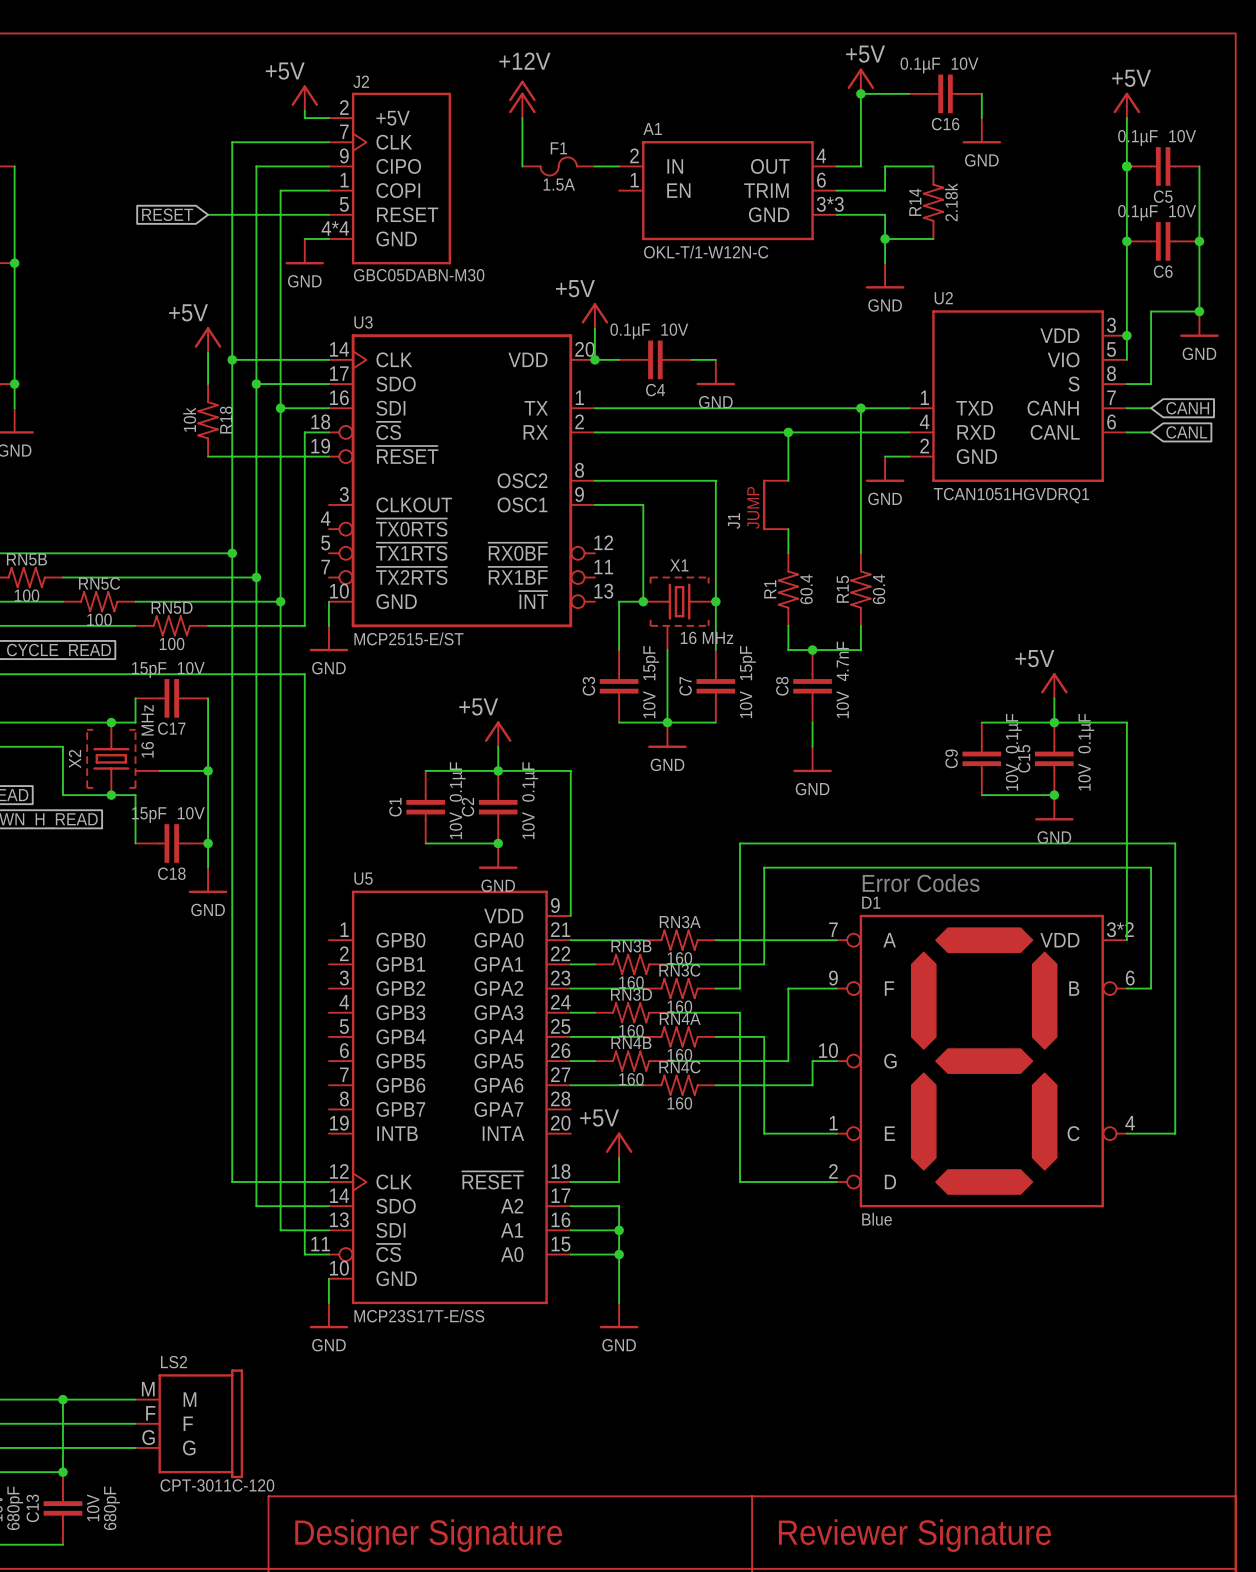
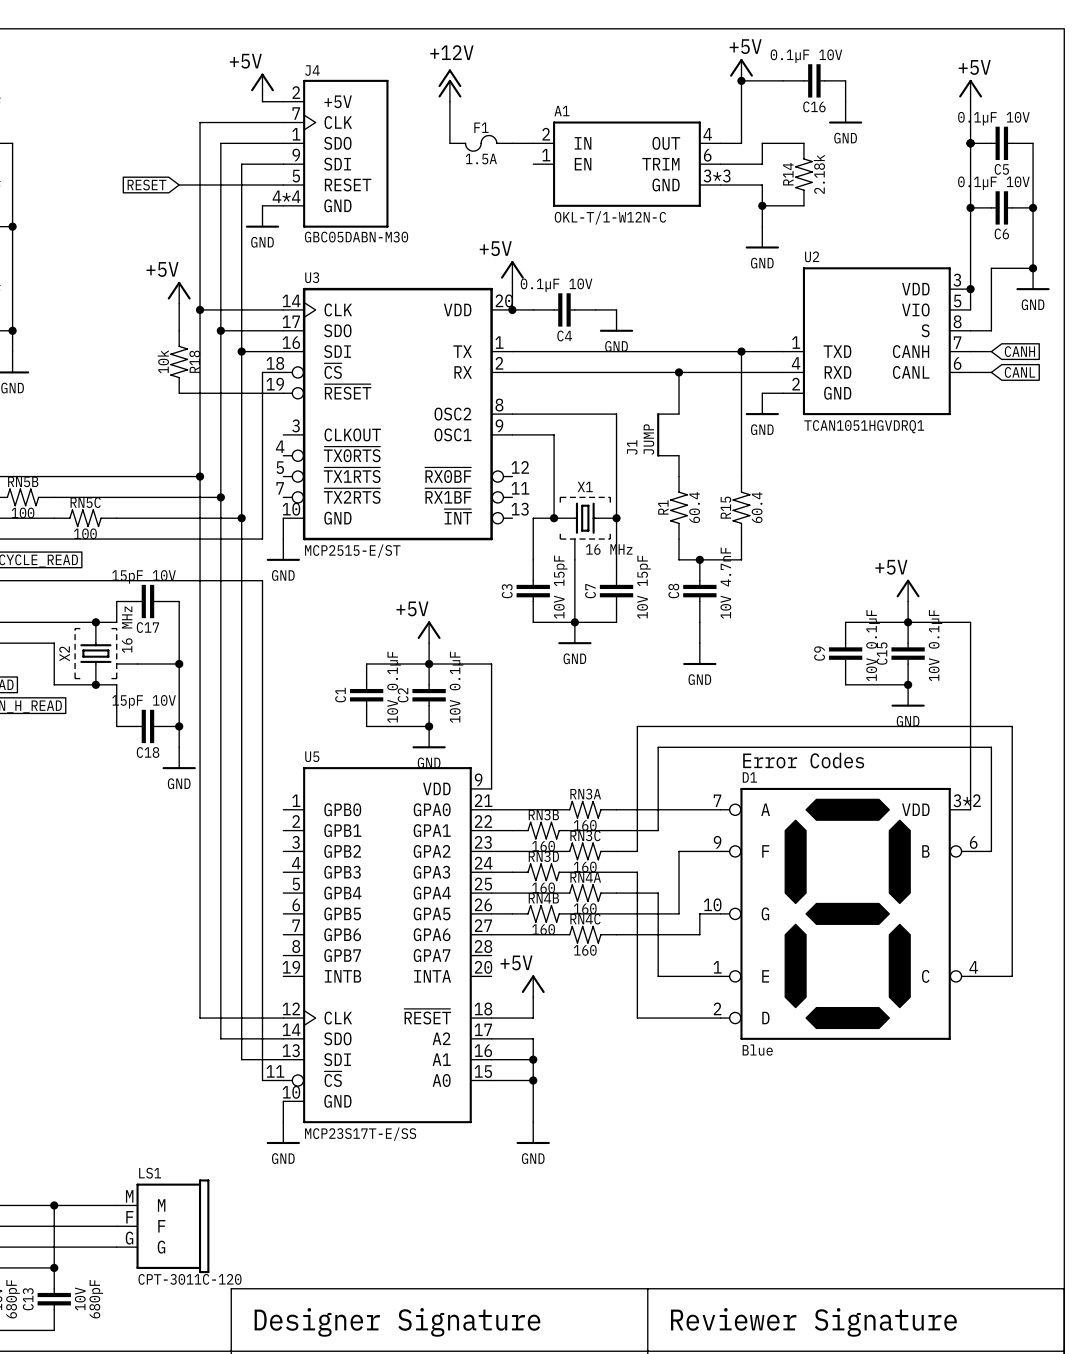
J2 name: J2 (361, 81) -> J4 (312, 70)
J2 pin number: 9 (344, 155) -> 1 (296, 134)
J2 pin name: CIPO (398, 166) -> SDO (337, 143)
J2 pin number: 1 (344, 180) -> 9 (296, 155)
J2 pin name: COPI (398, 190) -> SDI (337, 164)
RN5D: (171, 625) -> none
LS2 name: LS2 (174, 1362) -> LS1 (150, 1173)

